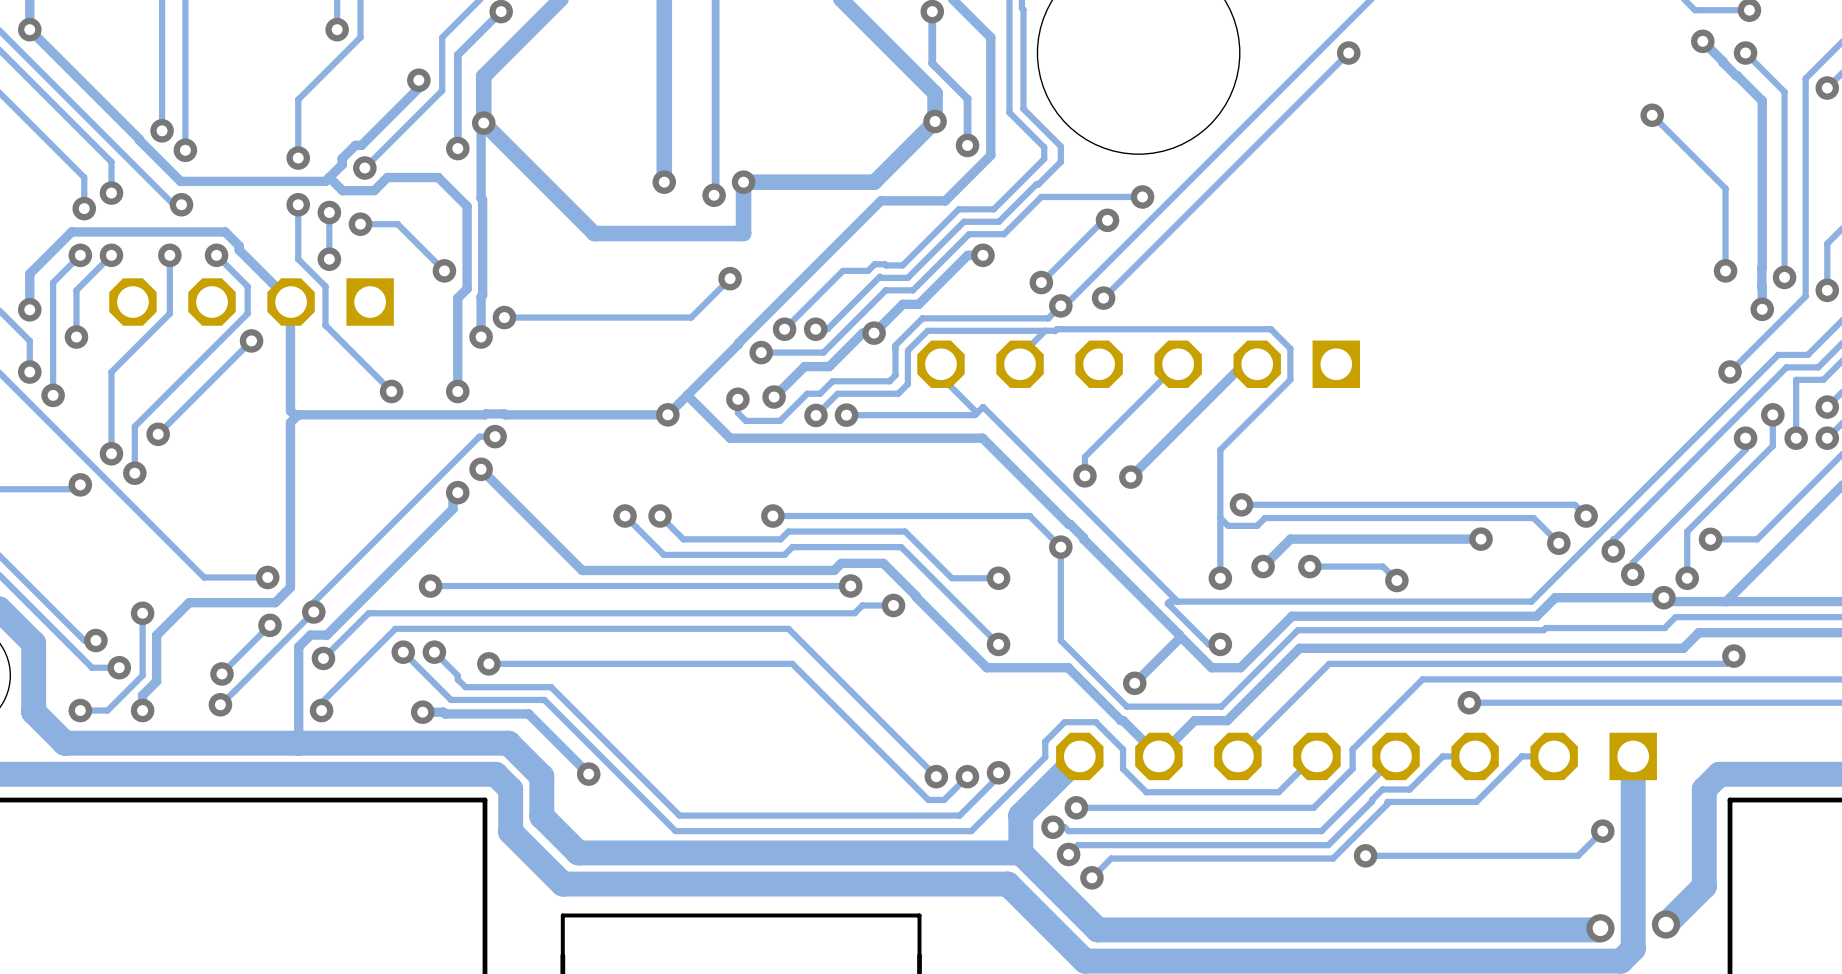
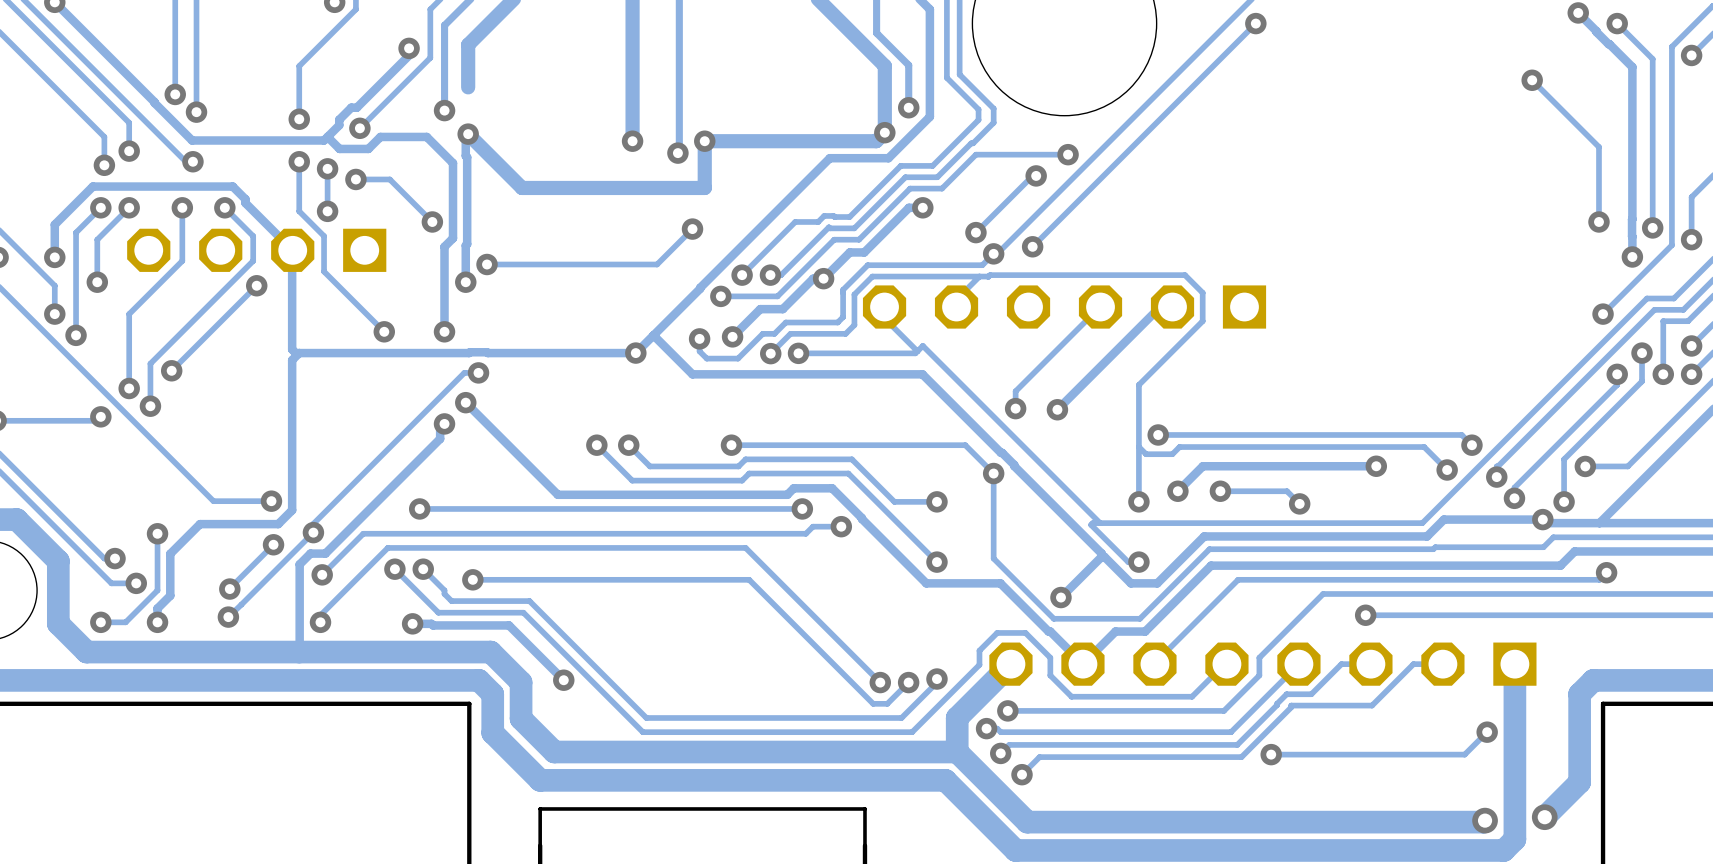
track: (935, 93) (935, 121) (874, 182) -> (879, 60) (884, 66) (884, 132) (876, 141) (823, 141)
via position: (935, 121) -> (884, 132)
via position: (483, 123) -> (468, 134)
track: (481, 177) (481, 125) (483, 123) (594, 233) -> (468, 134) (522, 187) (568, 187)

